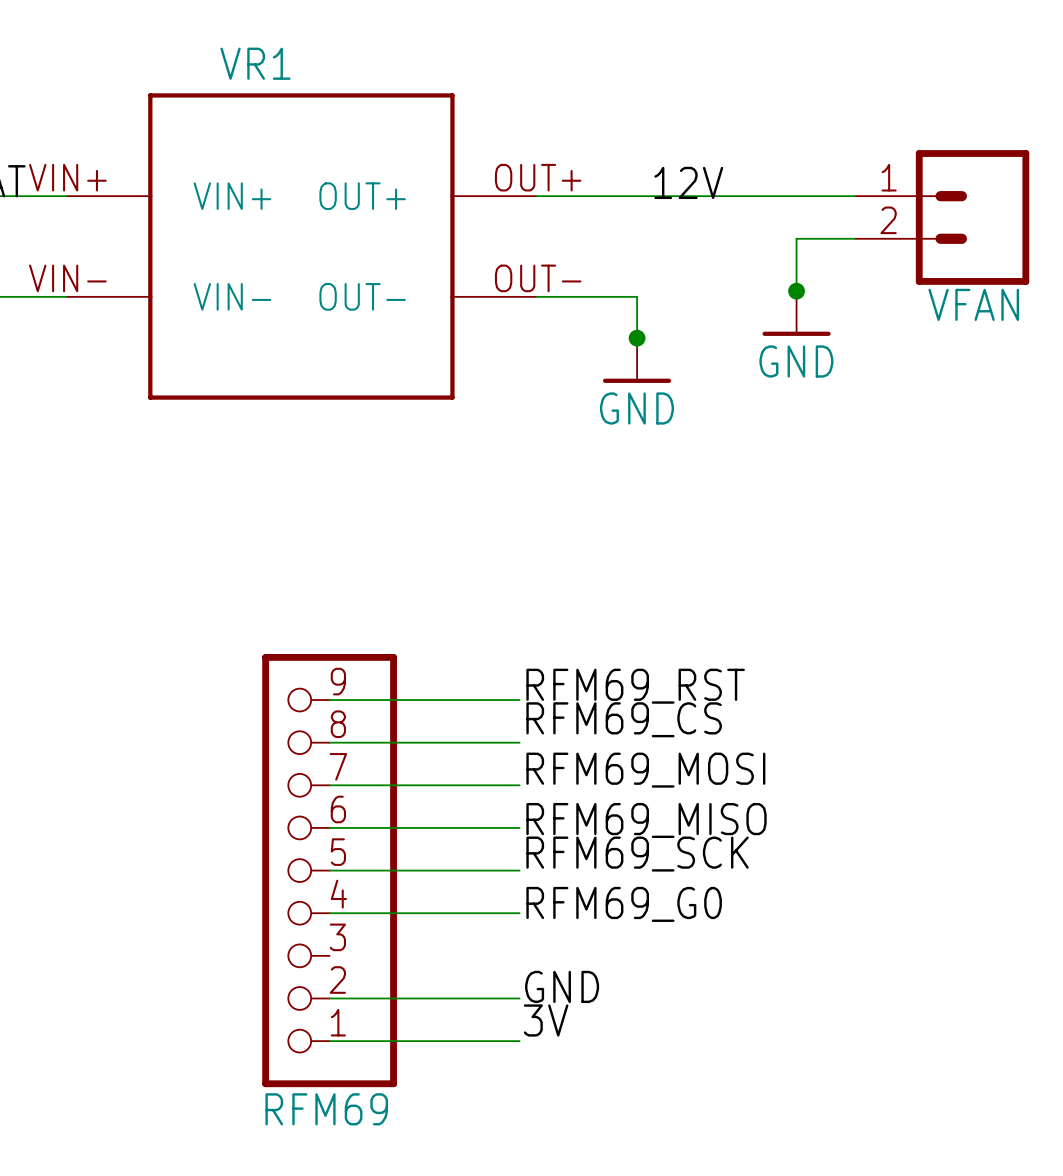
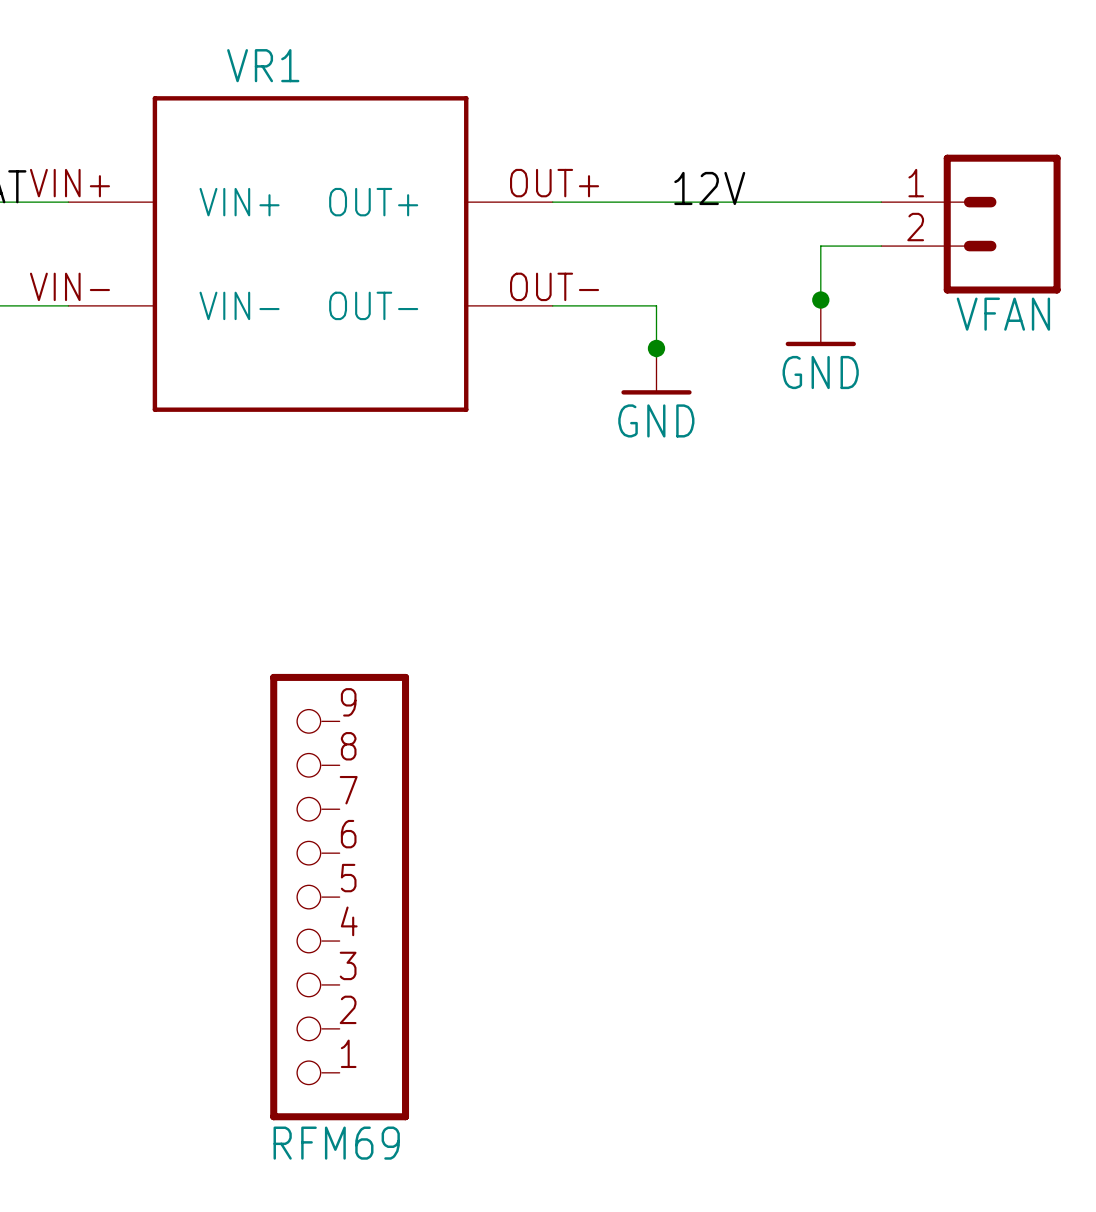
label: RFM69_RST (635, 686) -> none
wire: (329, 700) (519, 700) -> none
label: RFM69_CS (624, 719) -> none
wire: (329, 742) (519, 742) -> none
label: RFM69_MOSI (645, 770) -> none
wire: (329, 785) (519, 785) -> none
label: RFM69_MISO (646, 820) -> none
wire: (329, 827) (519, 827) -> none
label: RFM69_SCK (637, 854) -> none
wire: (329, 870) (519, 870) -> none
label: RFM69_G0 (624, 904) -> none
wire: (329, 913) (519, 913) -> none
label: GND (562, 986) -> none
wire: (329, 998) (519, 998) -> none
label: 3V (546, 1020) -> none
wire: (329, 1041) (519, 1041) -> none

